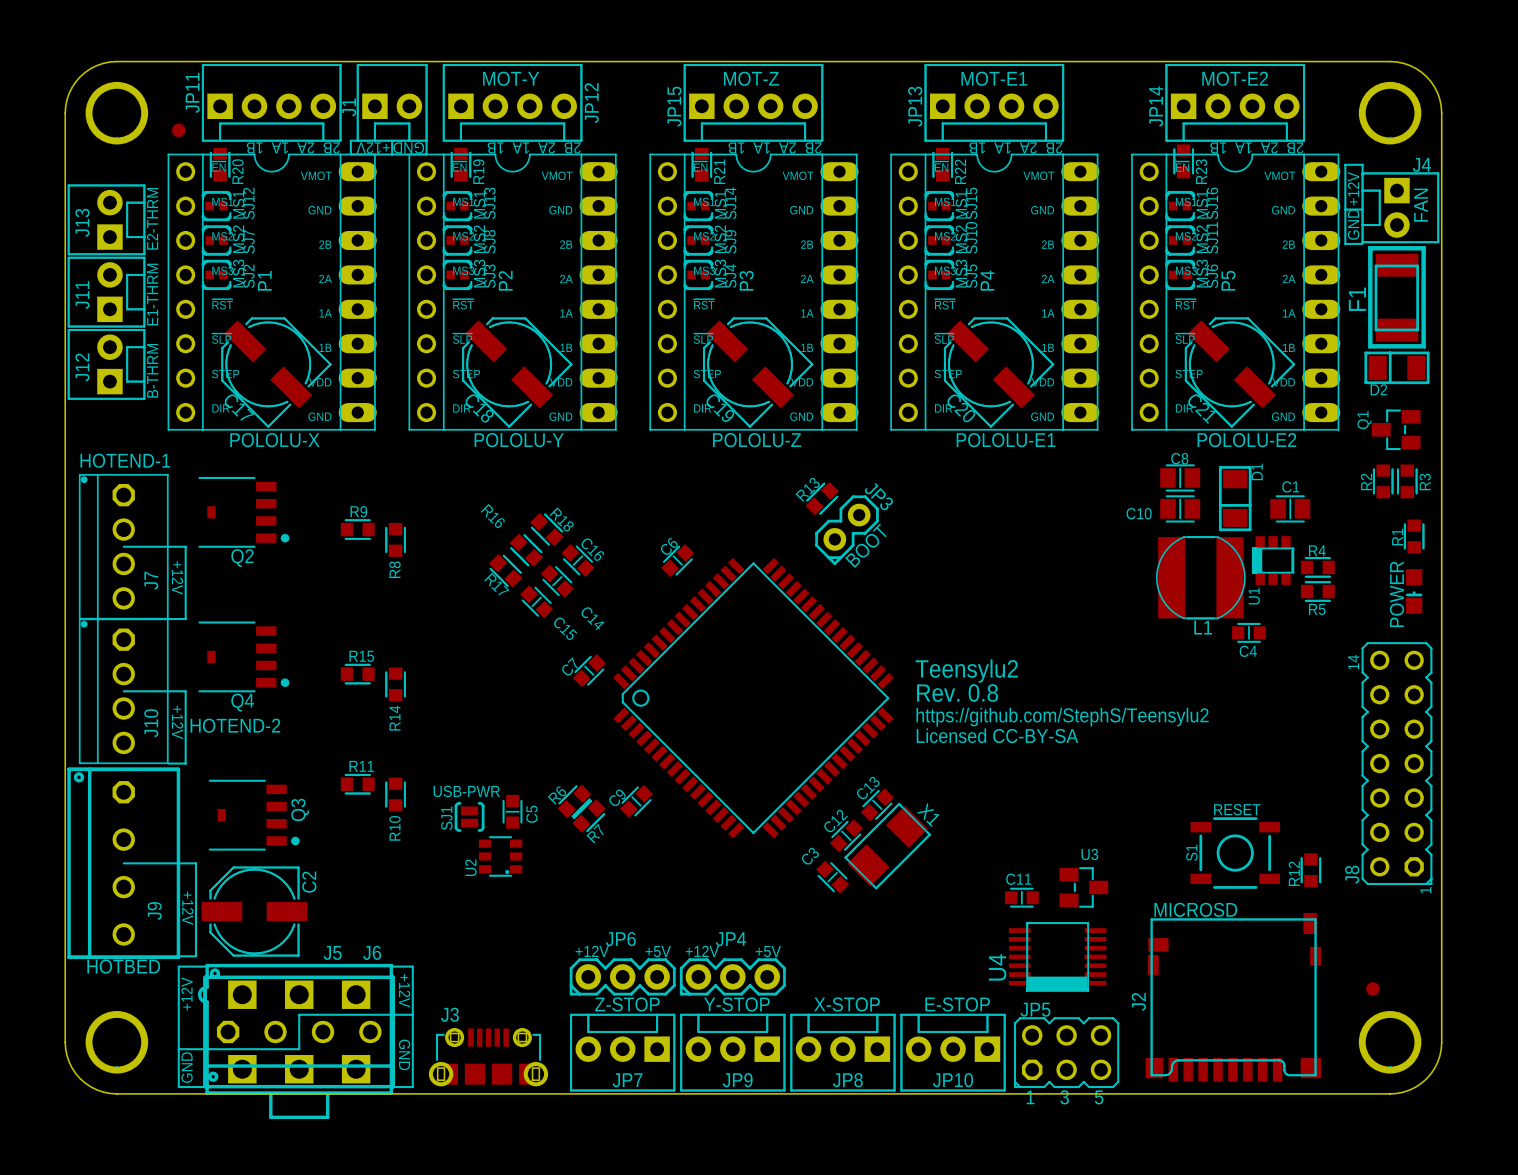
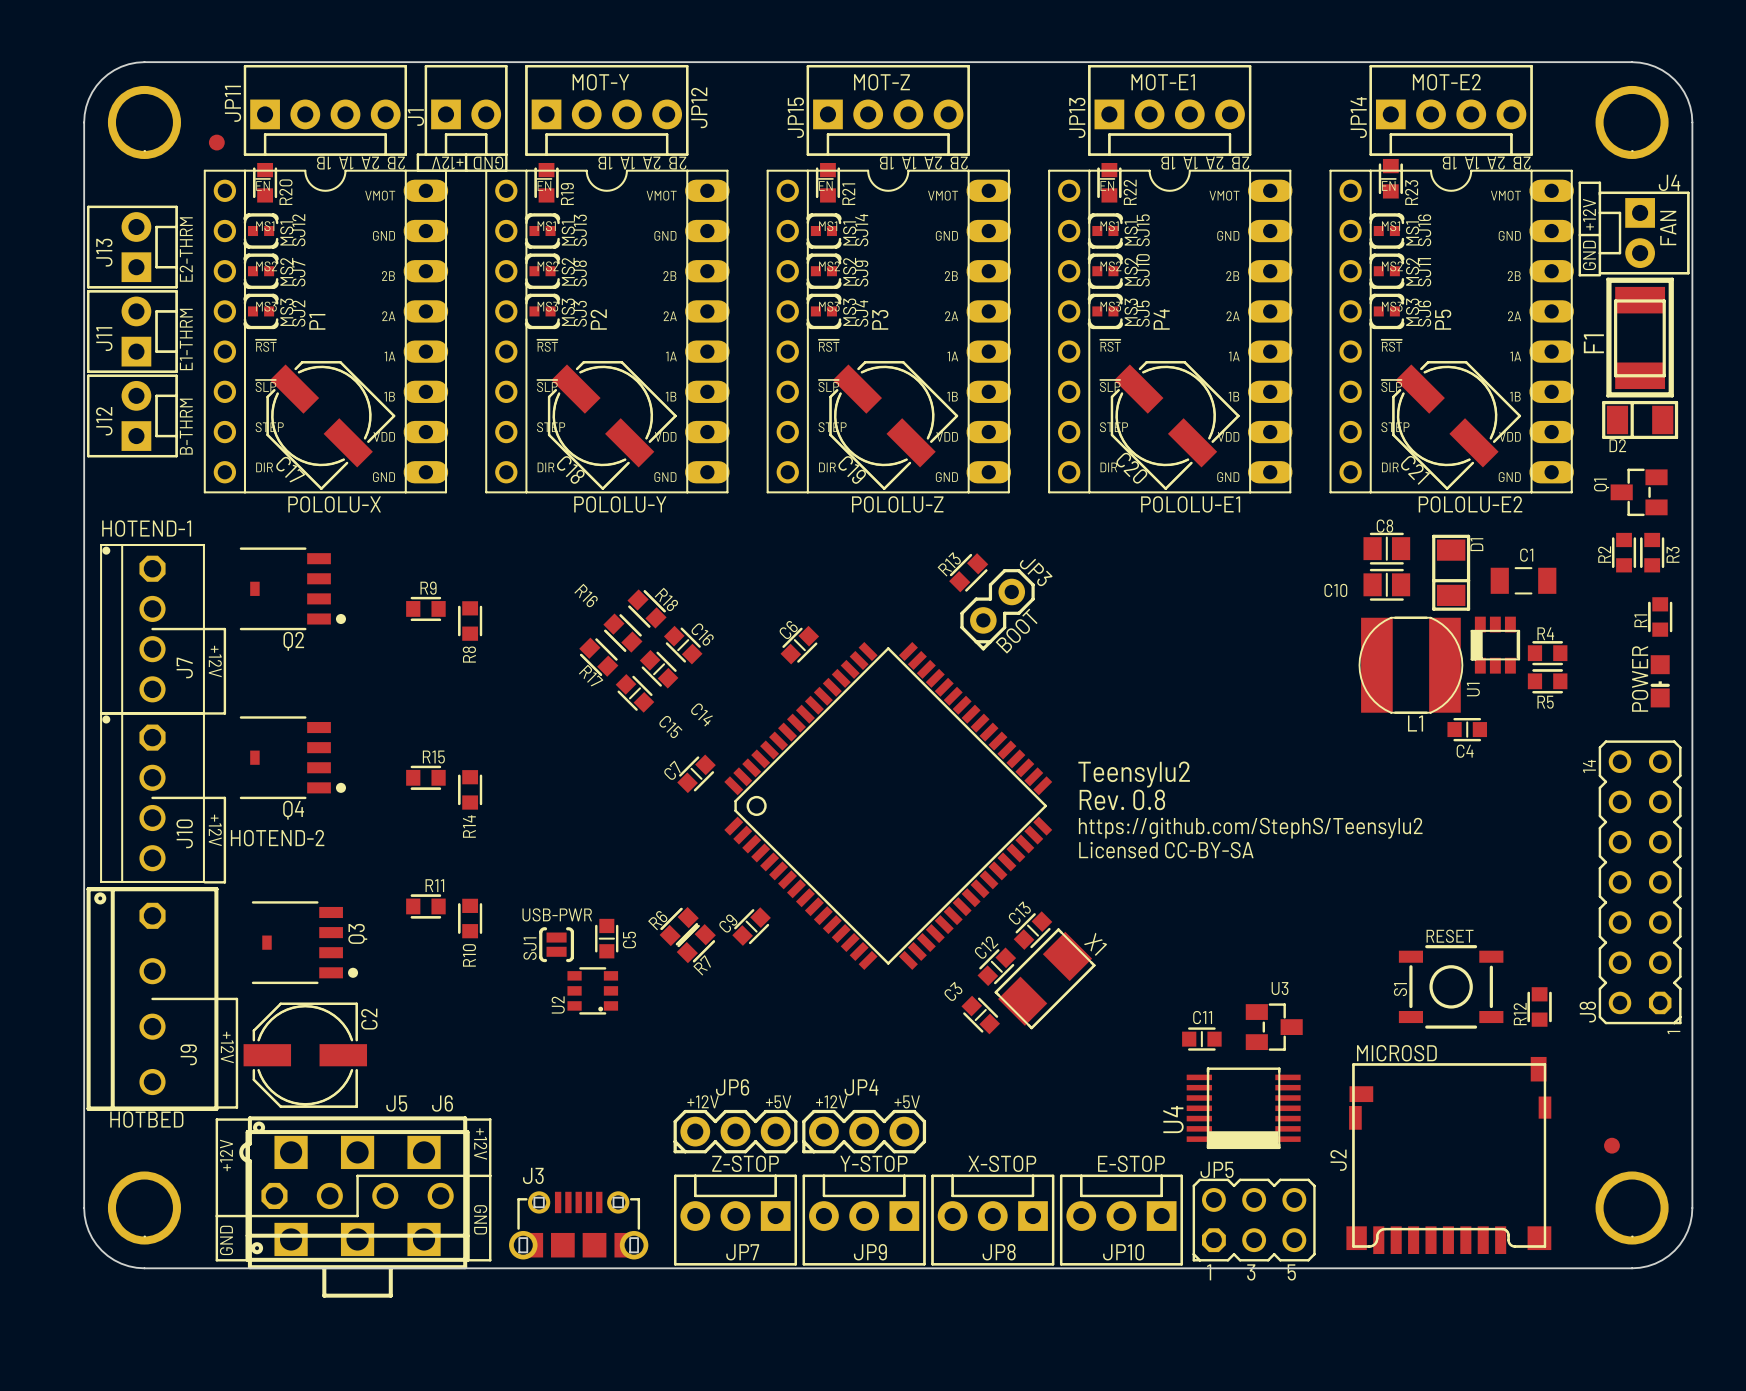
C1 footprint: [1270, 495, 1311, 523] -> [1490, 567, 1557, 595]

